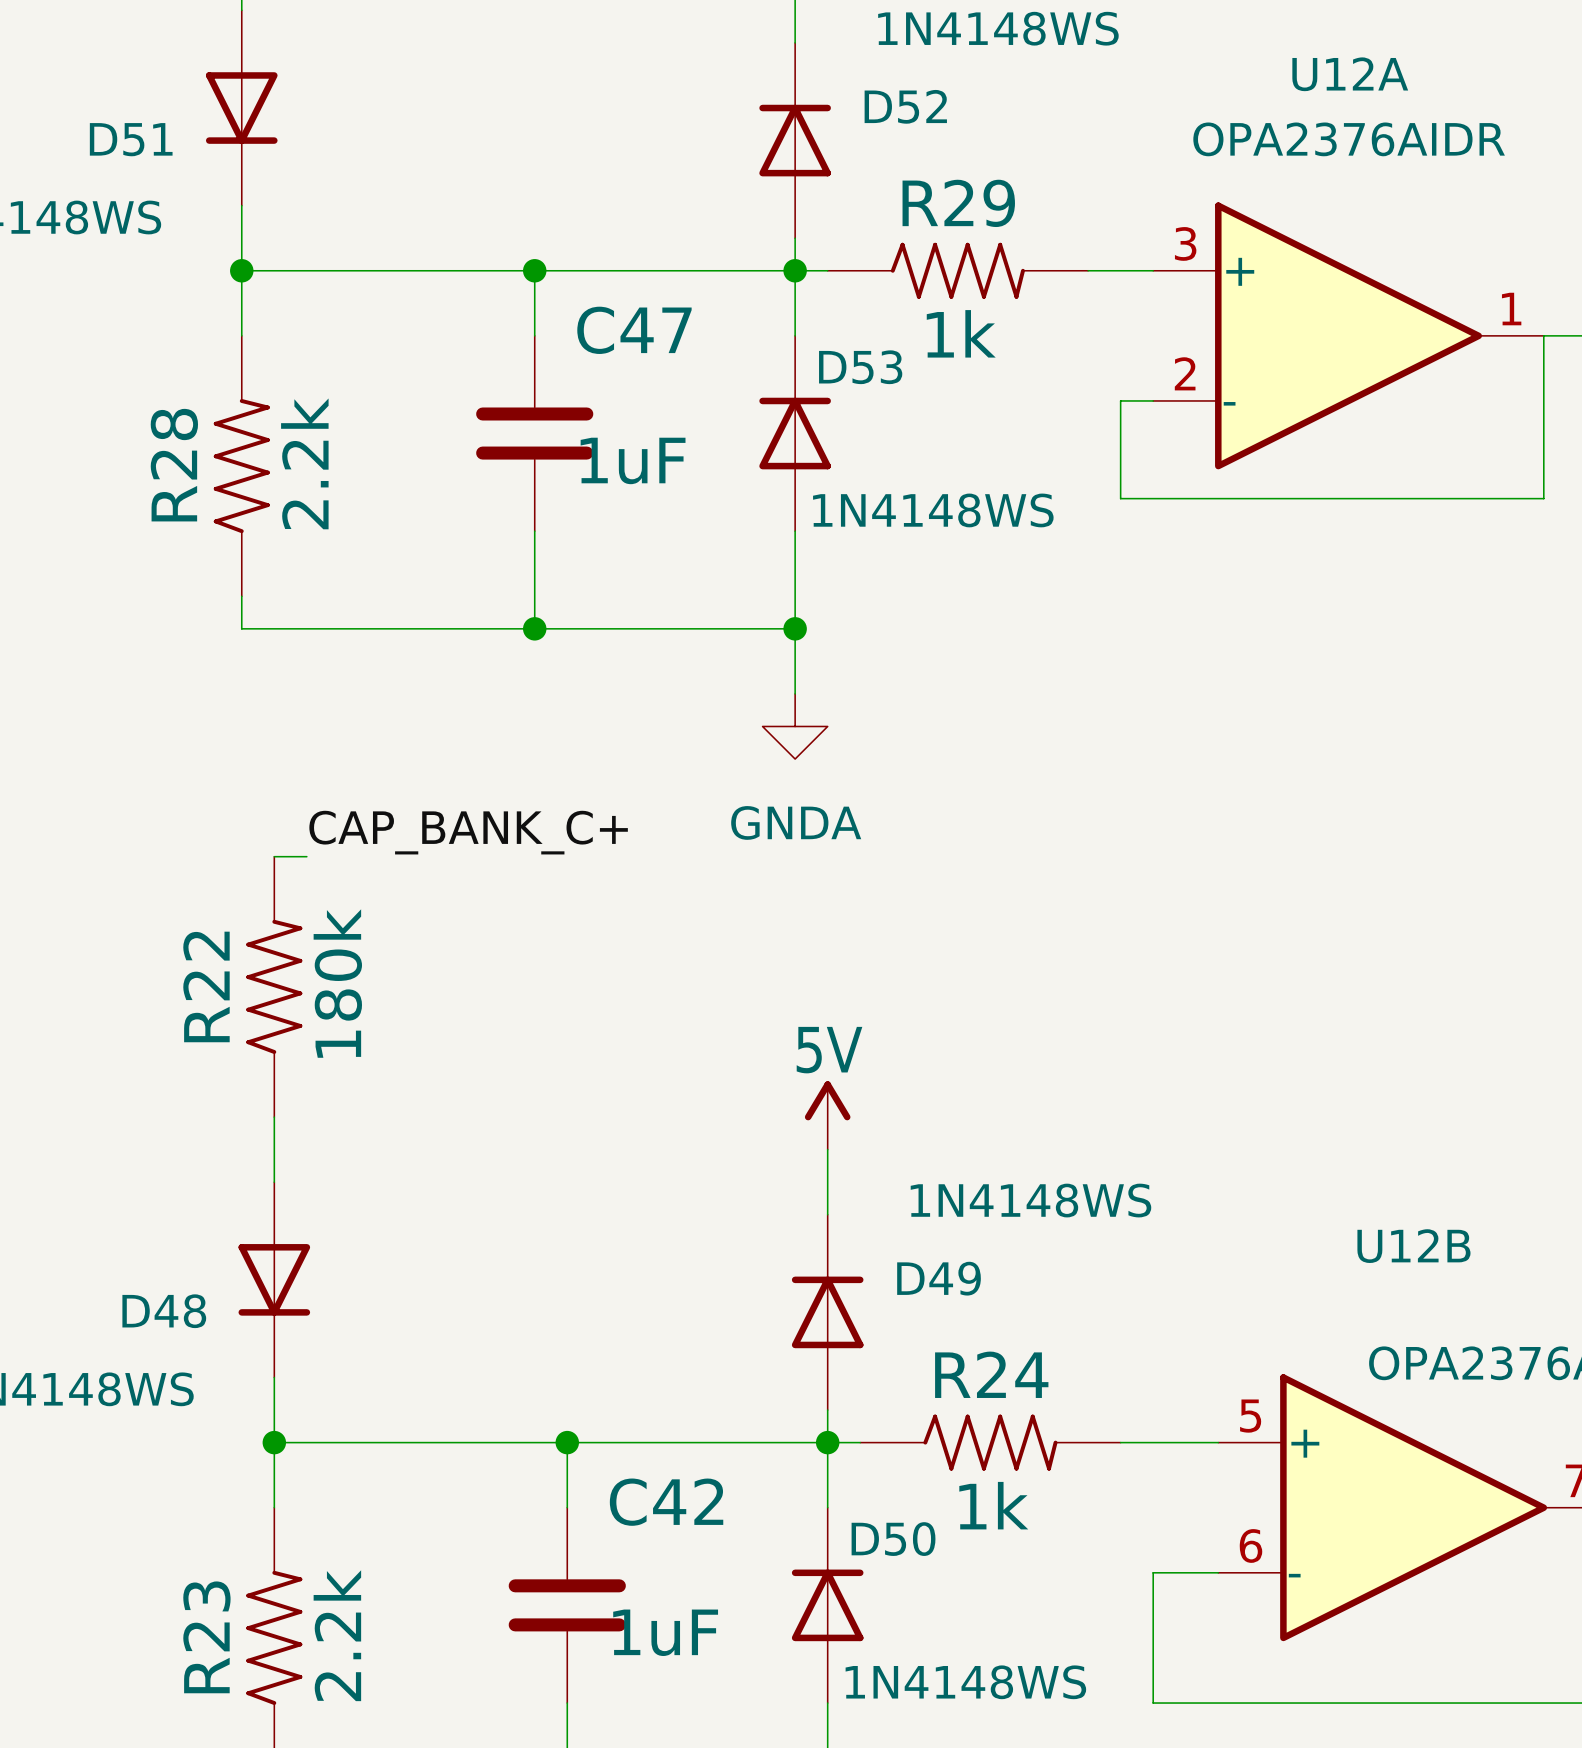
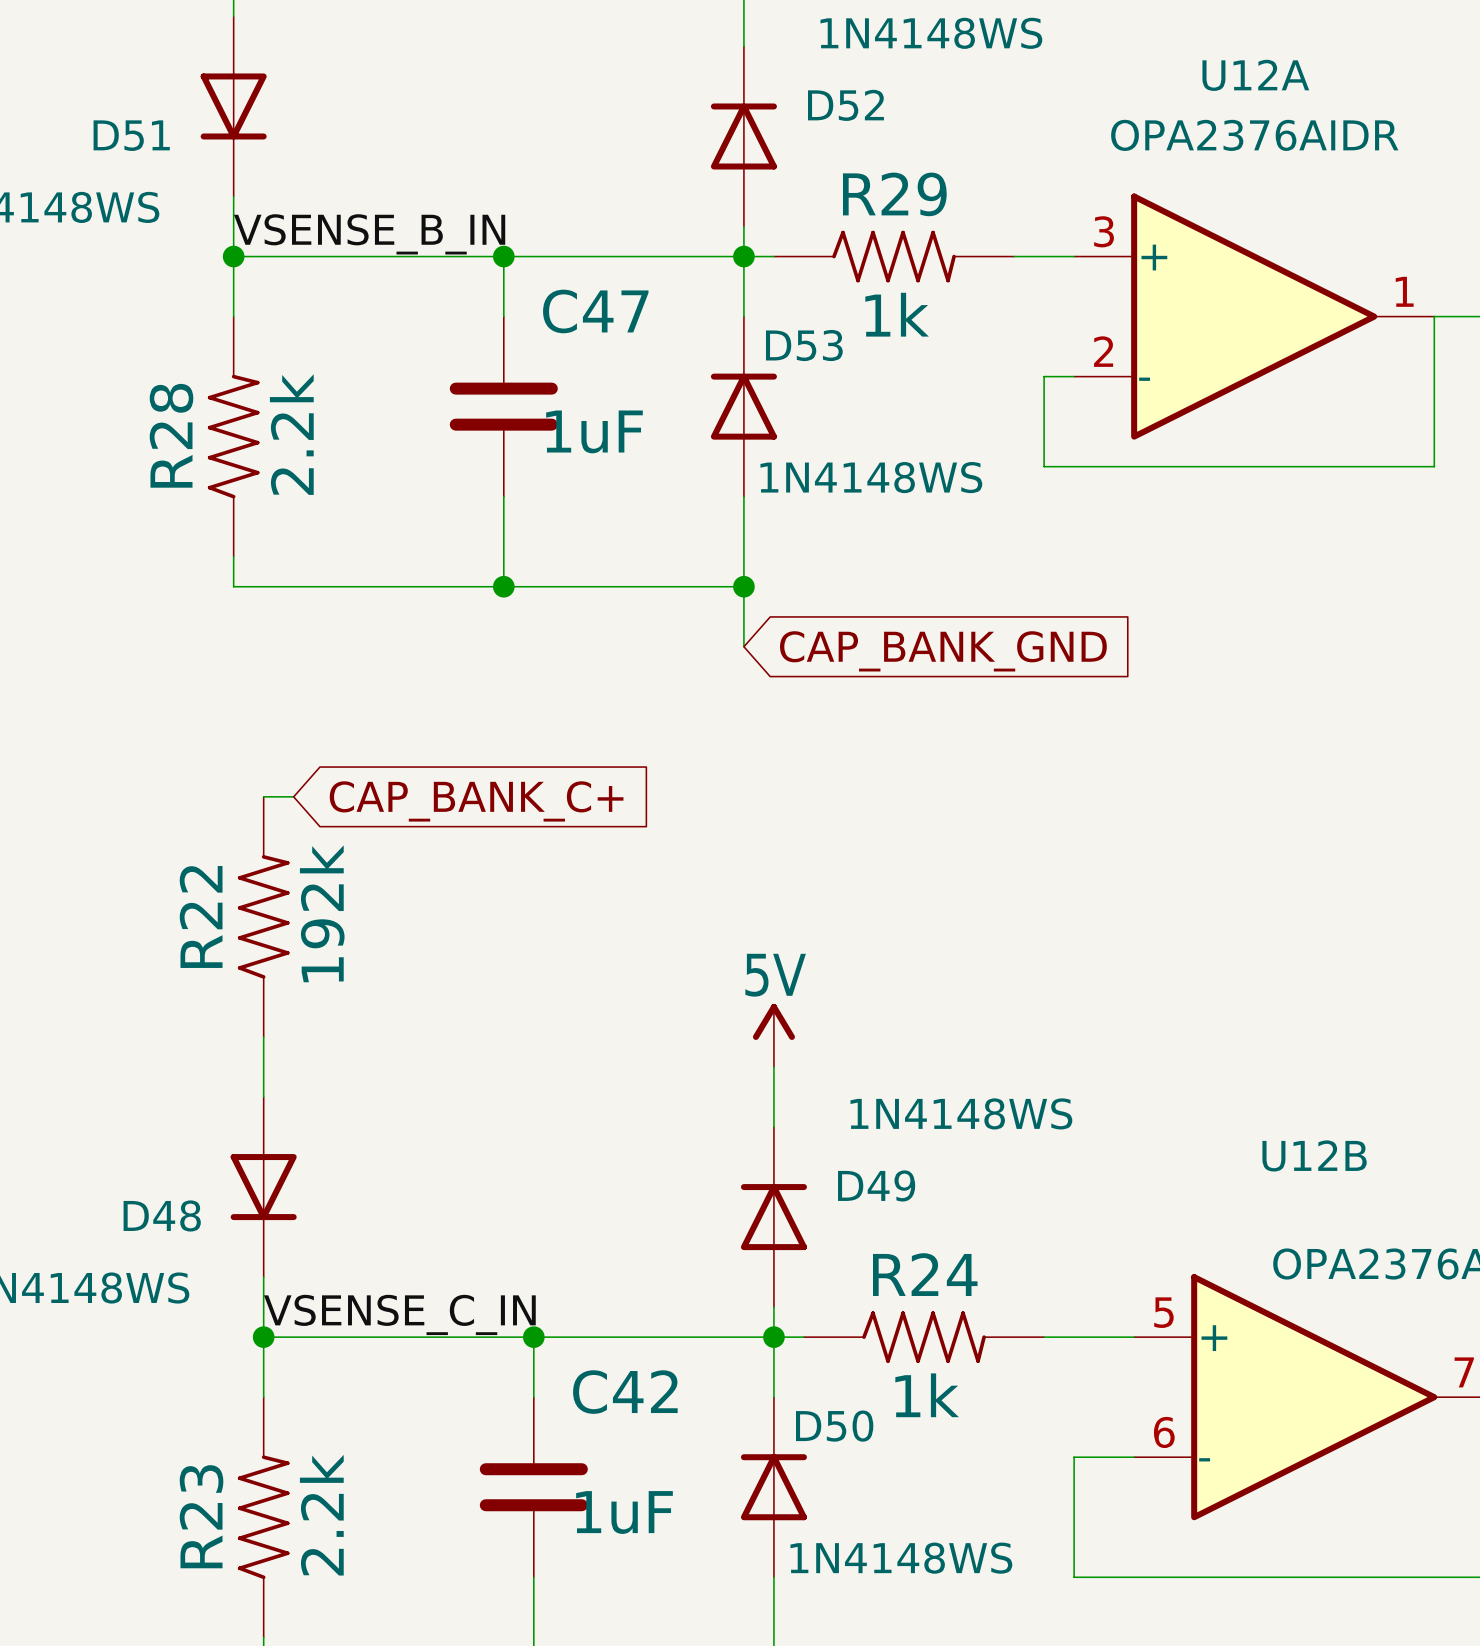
label: none -> VSENSE_B_IN (369, 234)
global label: none -> CAP_BANK_GND (943, 651)
power symbol: GNDA (795, 726) -> none
label: CAP_BANK_C+ (468, 832) -> none
global label: none -> CAP_BANK_C+ (476, 801)
R22 value: 180k (337, 983) -> 192k (322, 913)
label: none -> VSENSE_C_IN (399, 1314)

